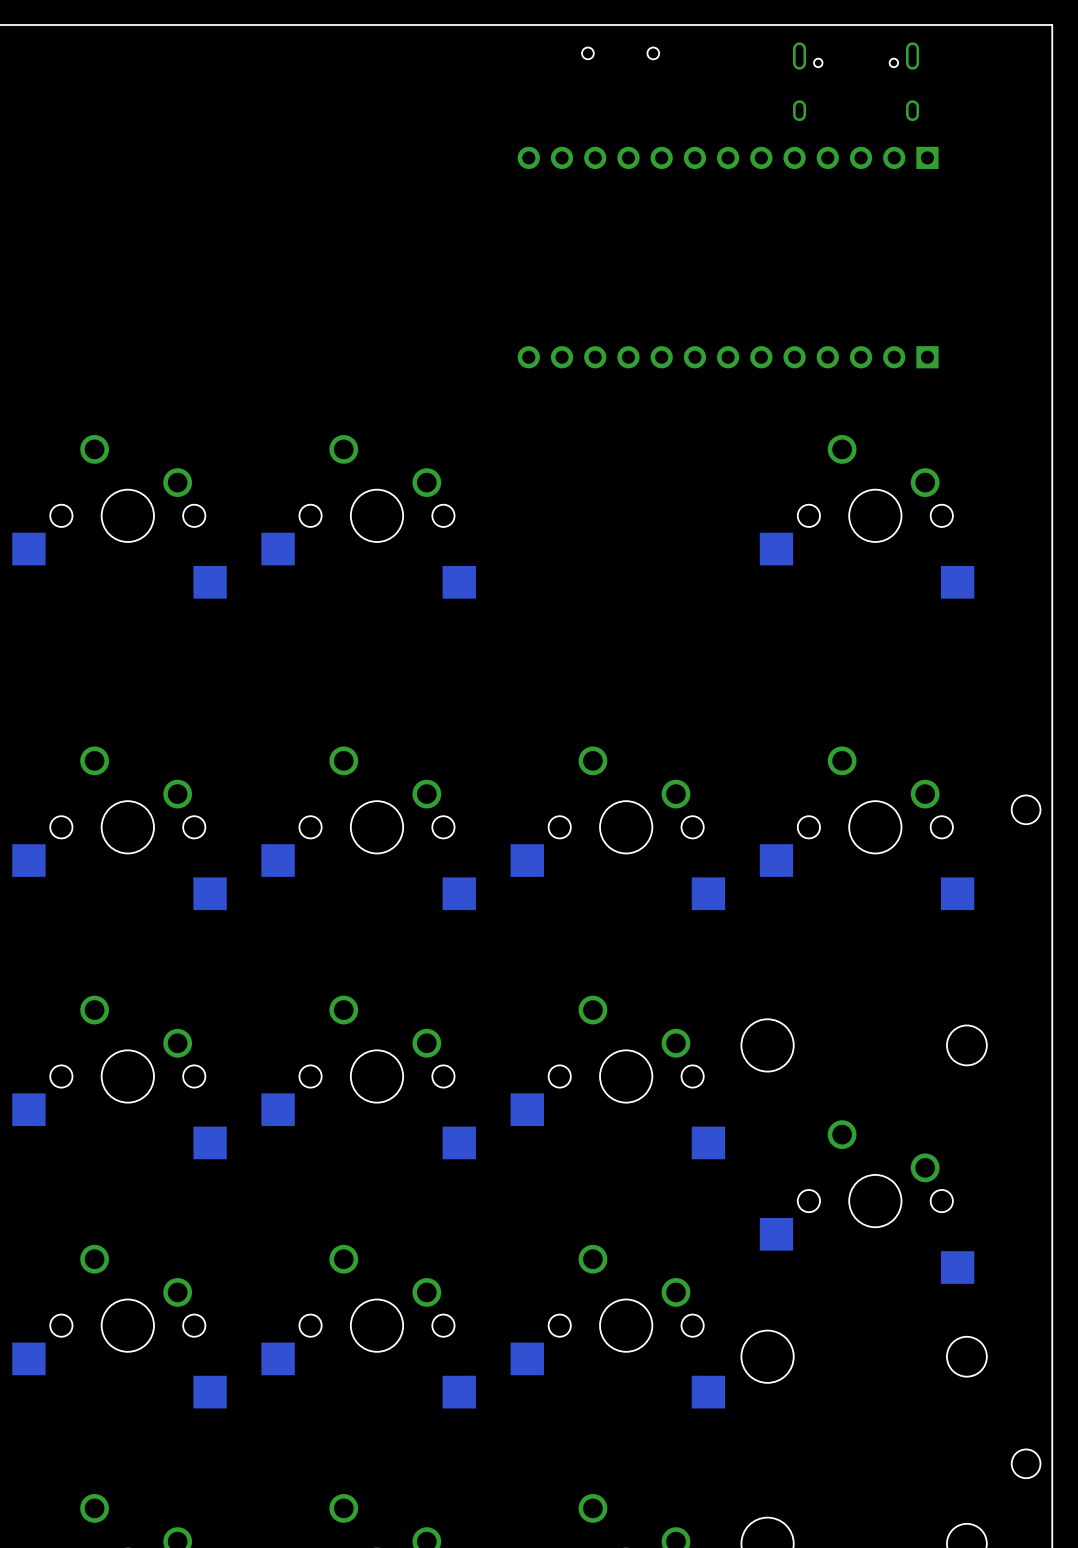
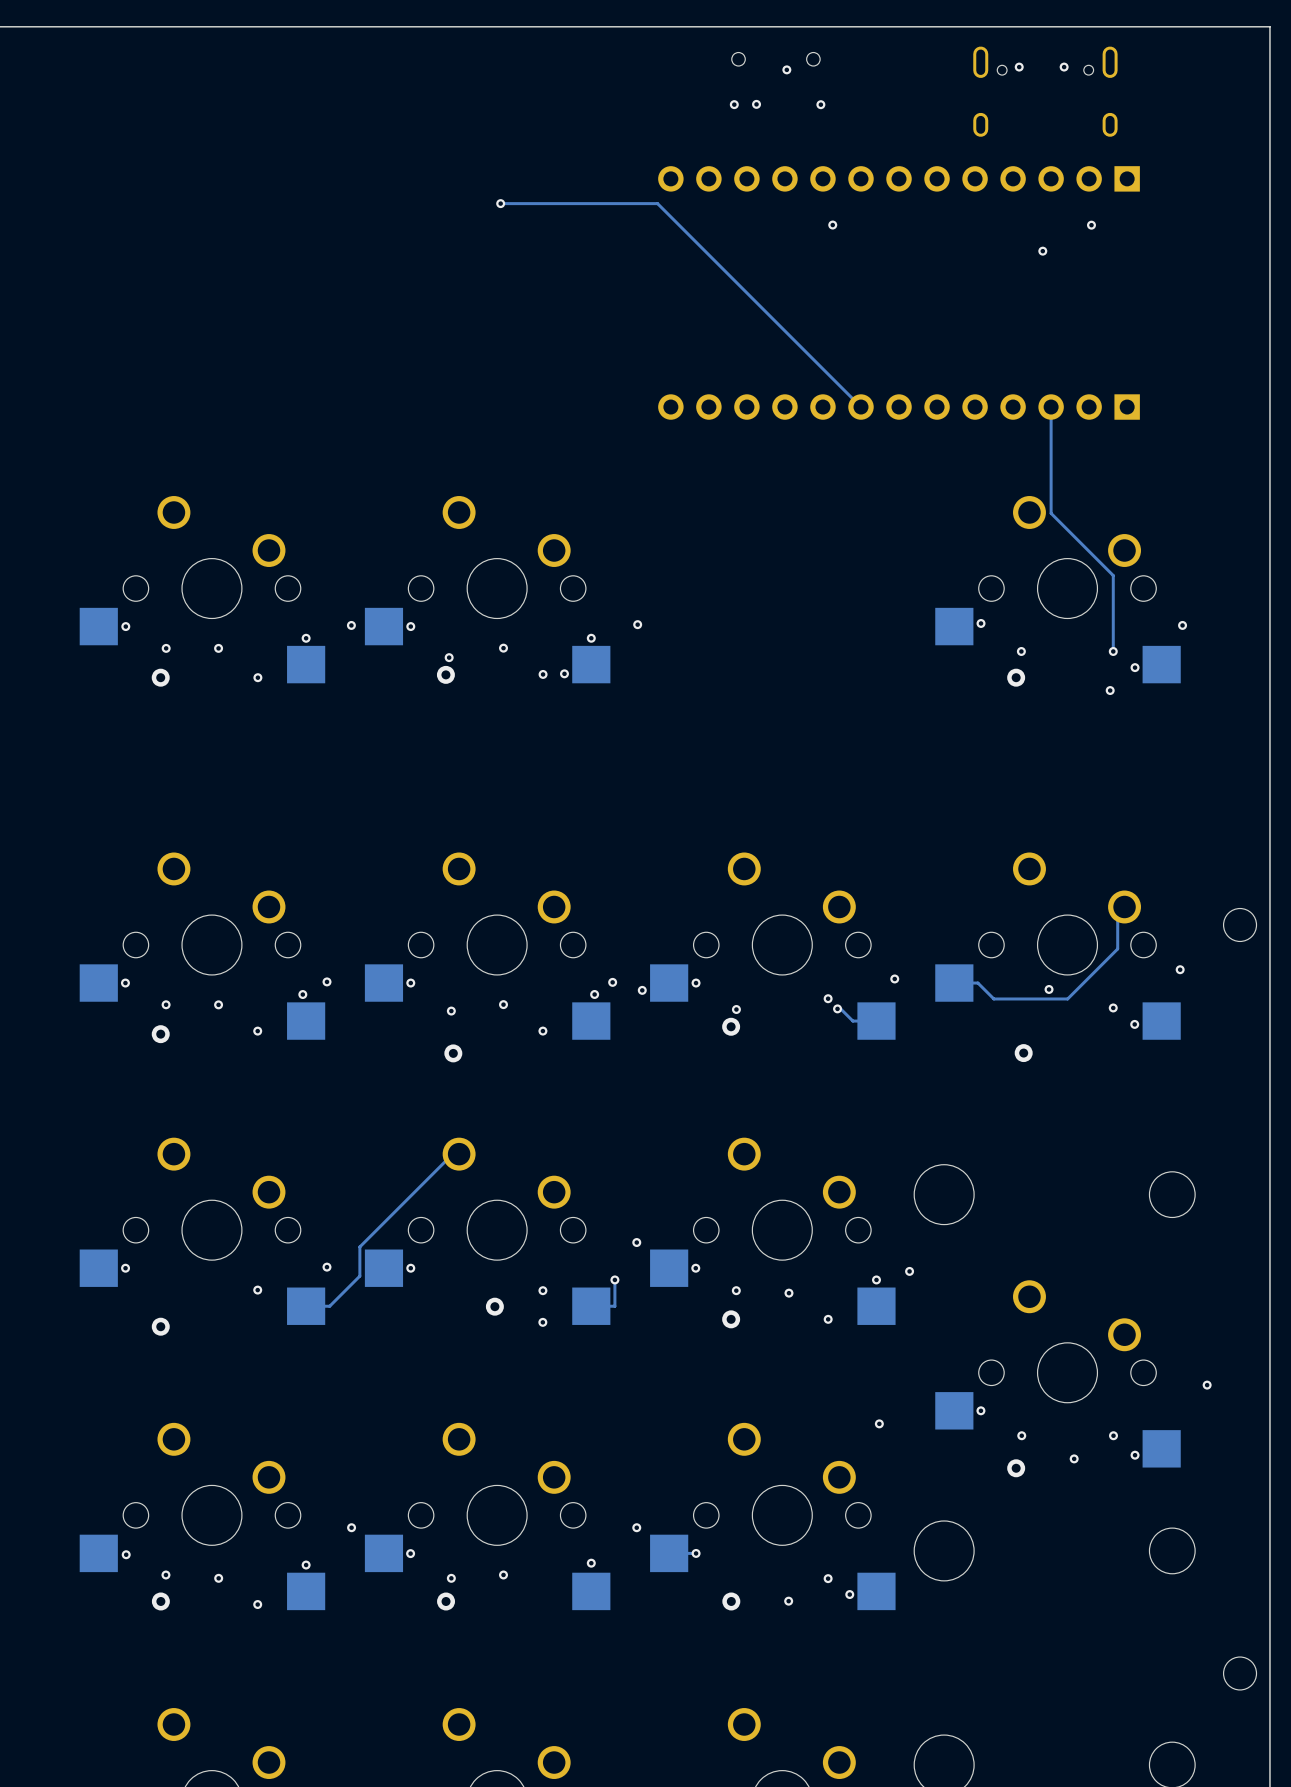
via: none -> (1019, 67)
via: none -> (1064, 67)
via: none -> (786, 69)
via: none -> (756, 104)
via: none -> (734, 104)
via: none -> (820, 104)
track: none -> (500, 203) (657, 203) (860, 407)
via: none -> (500, 203)
via: none -> (832, 225)
via: none -> (1091, 225)
via: none -> (1042, 251)
track: none -> (1051, 407) (1051, 513) (1113, 575) (1113, 651)
via: none -> (981, 623)
via: none -> (637, 624)
via: none -> (351, 625)
via: none -> (1182, 625)
via: none -> (125, 626)
via: none -> (410, 626)
via: none -> (306, 638)
via: none -> (591, 638)
via: none -> (503, 648)
via: none -> (166, 648)
via: none -> (218, 648)
via: none -> (1021, 651)
via: none -> (1113, 651)
via: none -> (449, 657)
via: none -> (1135, 667)
via: none -> (543, 674)
via: none -> (564, 673)
via: none -> (445, 674)
via: none -> (160, 677)
via: none -> (257, 677)
via: none -> (1016, 677)
via: none -> (1110, 690)
track: none -> (1124, 906) (1117, 913) (1117, 948) (1067, 998) (993, 998) (977, 983) (954, 983)
via: none -> (1180, 969)
via: none -> (894, 978)
via: none -> (327, 981)
via: none -> (612, 982)
via: none -> (125, 983)
via: none -> (410, 983)
via: none -> (696, 983)
via: none -> (642, 990)
via: none -> (1049, 989)
via: none -> (302, 994)
via: none -> (594, 994)
via: none -> (828, 998)
via: none -> (166, 1004)
via: none -> (218, 1004)
via: none -> (503, 1004)
via: none -> (1113, 1007)
via: none -> (736, 1009)
track: none -> (837, 1008) (840, 1008) (852, 1021) (876, 1021)
via: none -> (837, 1008)
via: none -> (451, 1011)
via: none -> (1134, 1024)
via: none -> (731, 1026)
via: none -> (257, 1031)
via: none -> (542, 1031)
via: none -> (160, 1034)
via: none -> (1023, 1053)
via: none -> (453, 1053)
track: none -> (459, 1154) (452, 1154) (359, 1246) (359, 1276) (329, 1306) (306, 1306)
via: none -> (636, 1242)
via: none -> (326, 1267)
via: none -> (125, 1268)
via: none -> (410, 1268)
via: none -> (695, 1268)
via: none -> (909, 1271)
track: none -> (614, 1279) (614, 1306) (591, 1306)
via: none -> (614, 1279)
via: none -> (876, 1279)
via: none -> (257, 1290)
via: none -> (542, 1290)
via: none -> (736, 1290)
via: none -> (788, 1293)
via: none -> (494, 1306)
via: none -> (731, 1319)
via: none -> (828, 1319)
via: none -> (542, 1322)
via: none -> (160, 1326)
via: none -> (1207, 1385)
via: none -> (980, 1410)
via: none -> (879, 1423)
via: none -> (1021, 1435)
via: none -> (1113, 1435)
via: none -> (1135, 1455)
via: none -> (1074, 1458)
via: none -> (1016, 1468)
via: none -> (351, 1527)
via: none -> (636, 1527)
via: none -> (696, 1553)
via: none -> (410, 1553)
via: none -> (126, 1554)
via: none -> (591, 1563)
via: none -> (306, 1565)
via: none -> (165, 1575)
via: none -> (503, 1574)
via: none -> (218, 1578)
via: none -> (451, 1578)
via: none -> (828, 1578)
via: none -> (849, 1594)
via: none -> (160, 1601)
via: none -> (446, 1601)
via: none -> (731, 1601)
via: none -> (788, 1601)
via: none -> (257, 1604)

